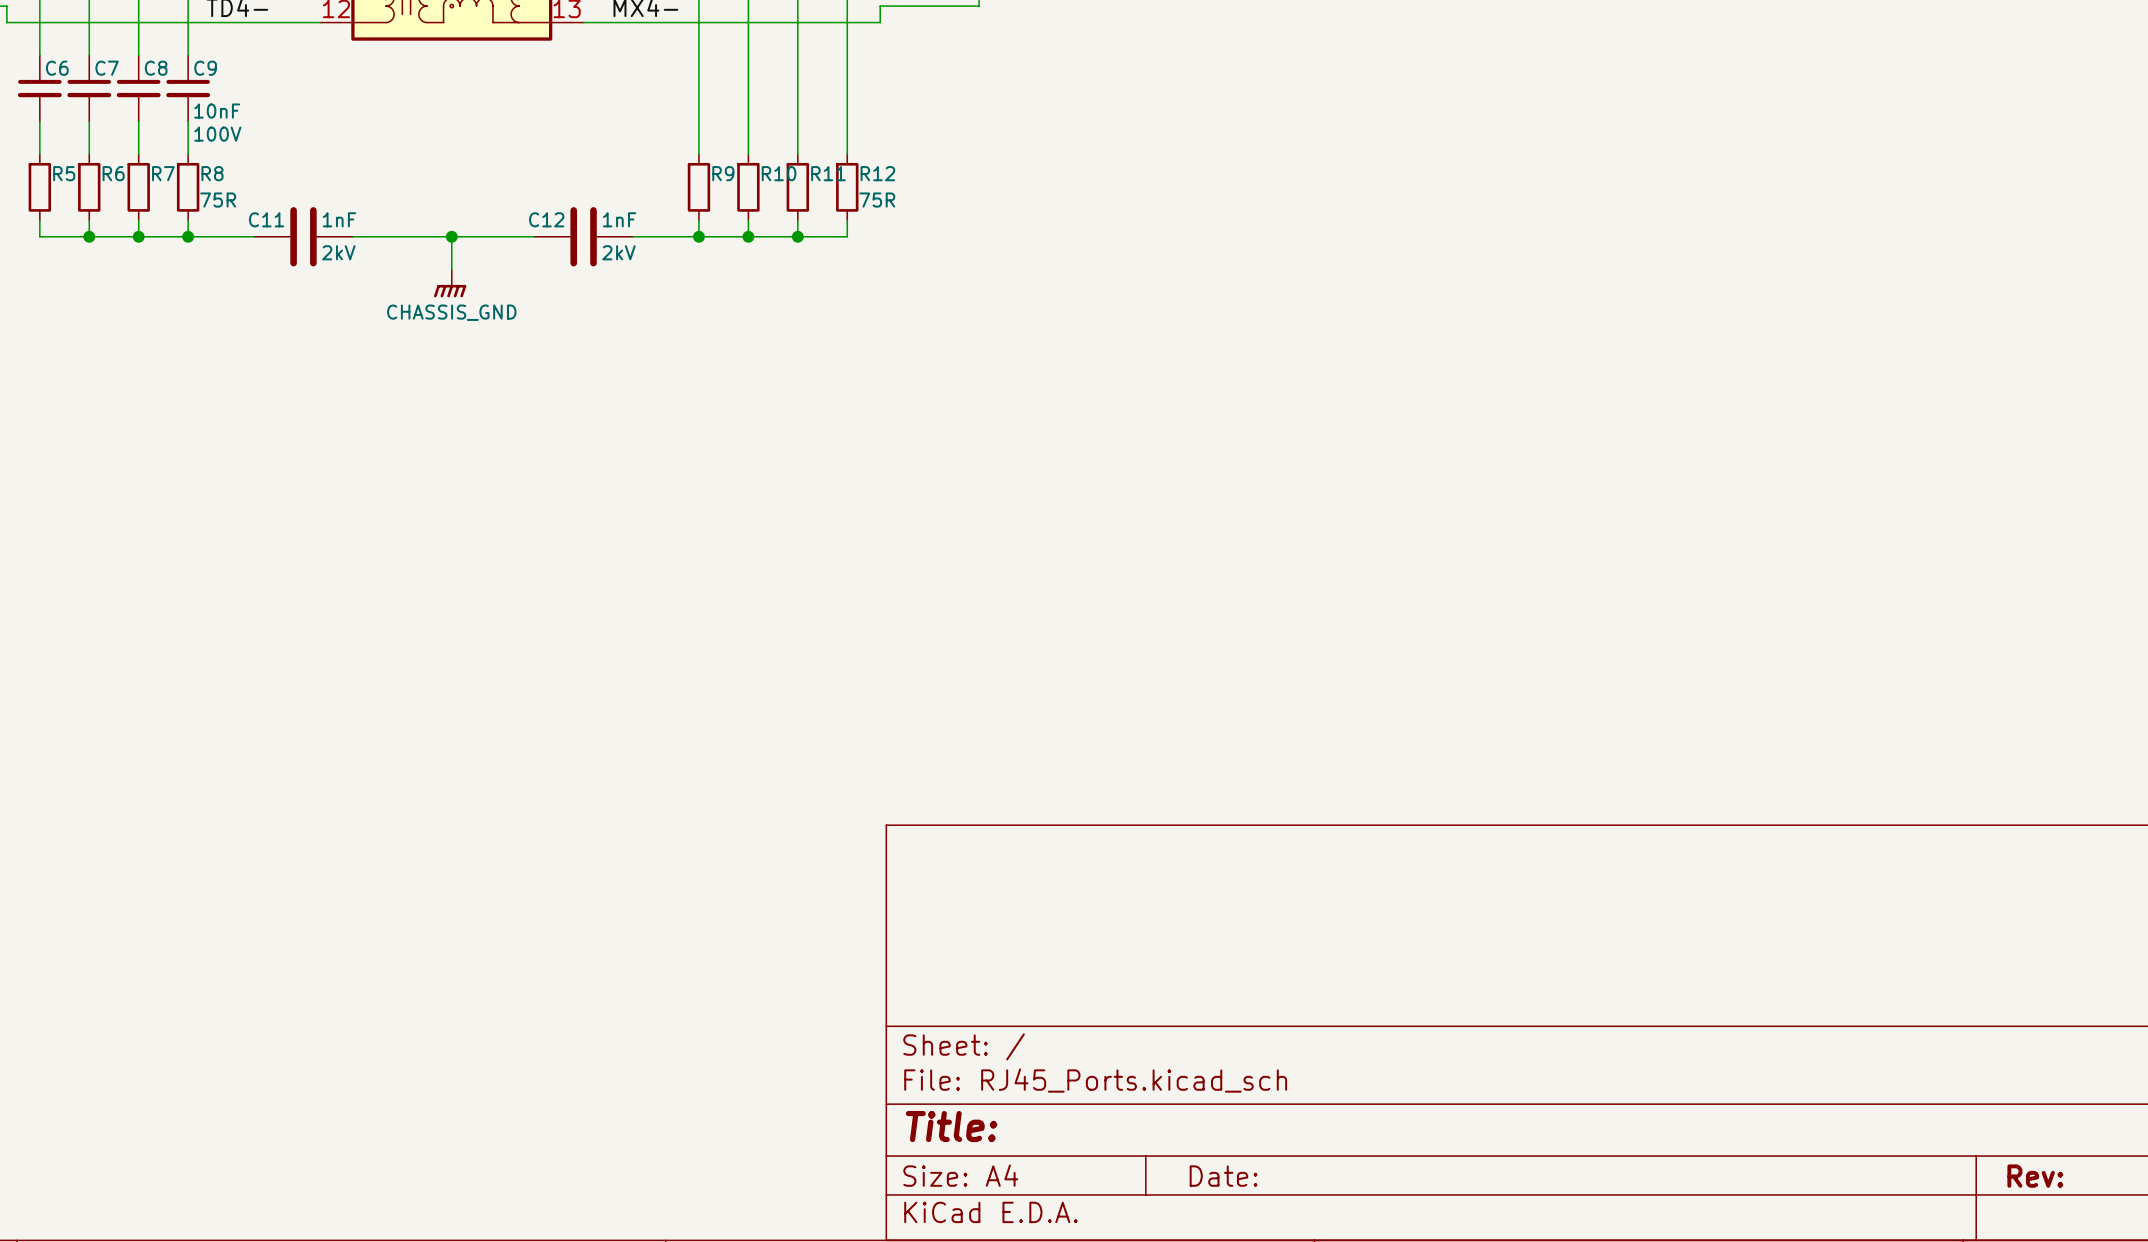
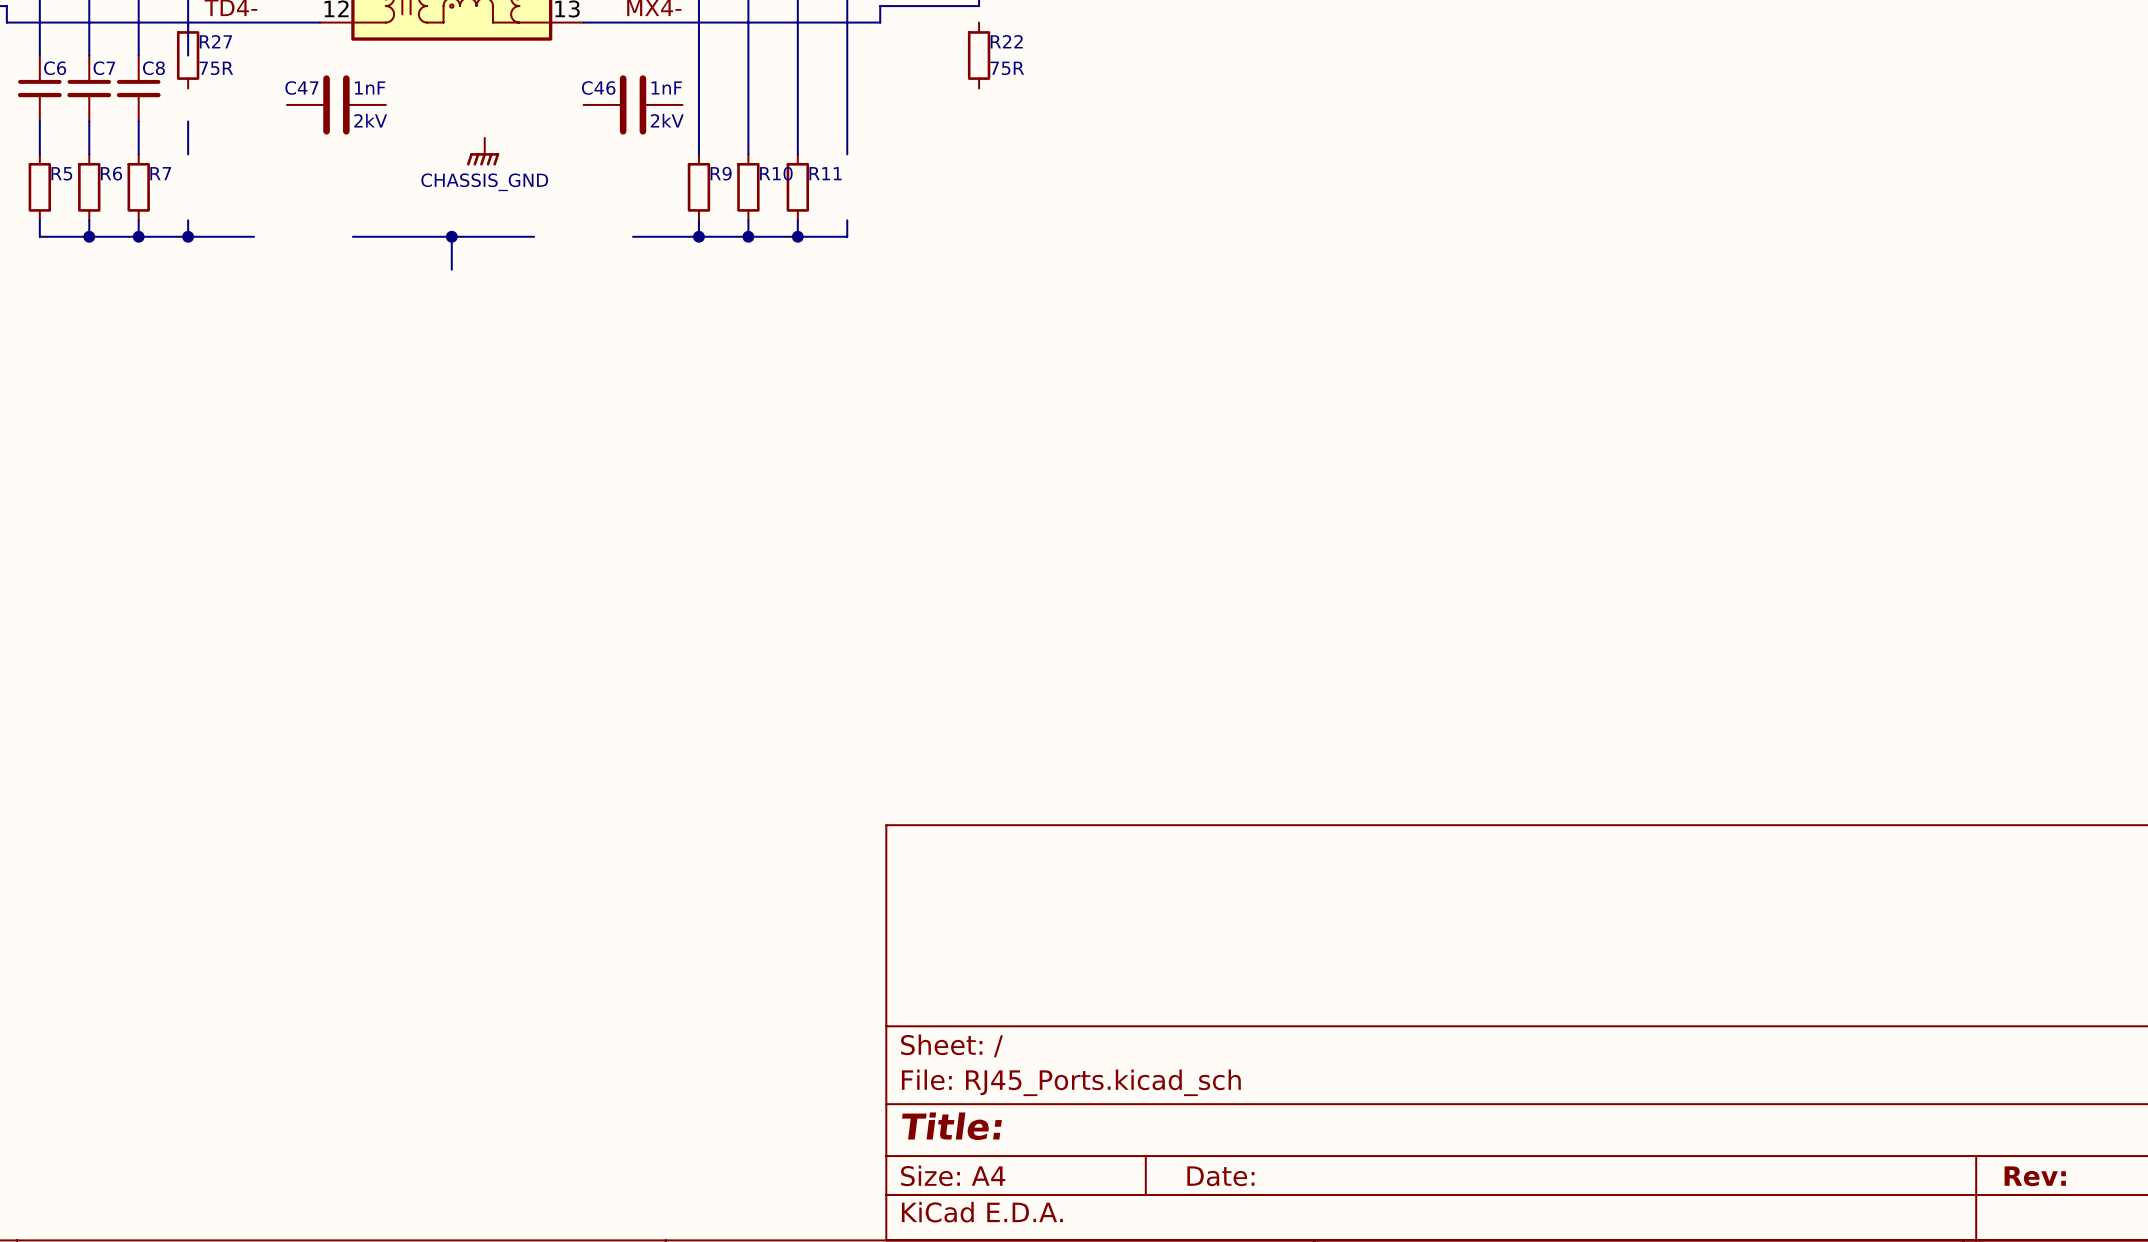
R27: none -> 75R (188, 55)
R22: none -> 75R (979, 55)
C9: 10nF (188, 88) -> none
C47: none -> 1nF (336, 104)
C46: none -> 1nF (633, 104)
R8: 75R (188, 187) -> none
R12: 75R (847, 187) -> none
C11: 1nF (303, 236) -> none
C12: 1nF (583, 236) -> none
power symbol position: CHASSIS_GND (450, 283) -> CHASSIS_GND (483, 151)

